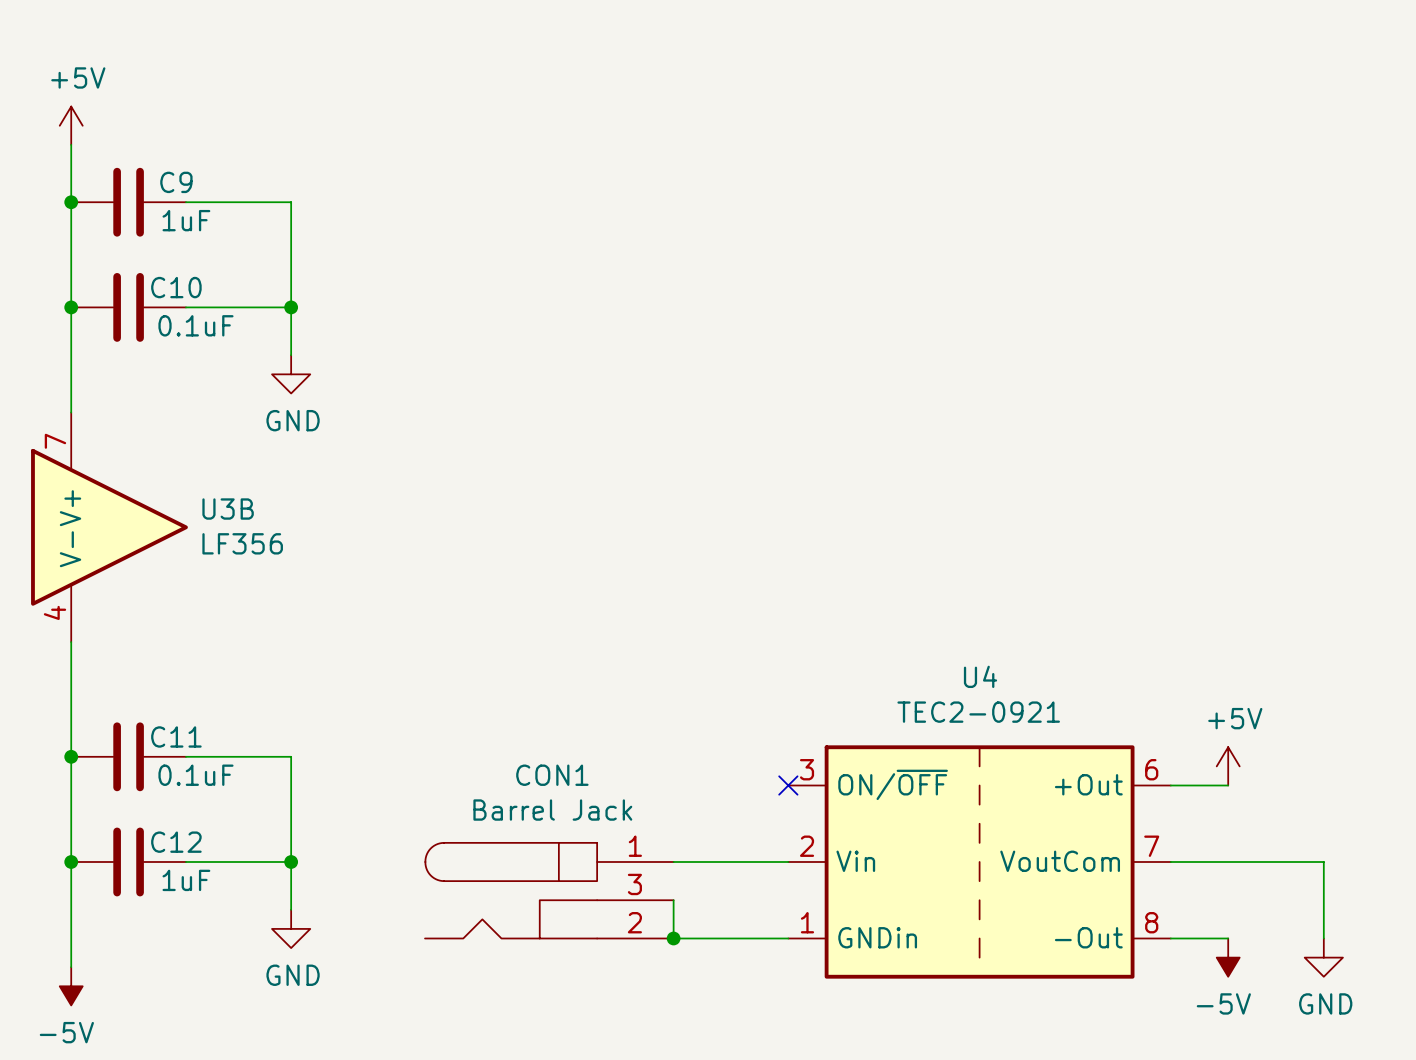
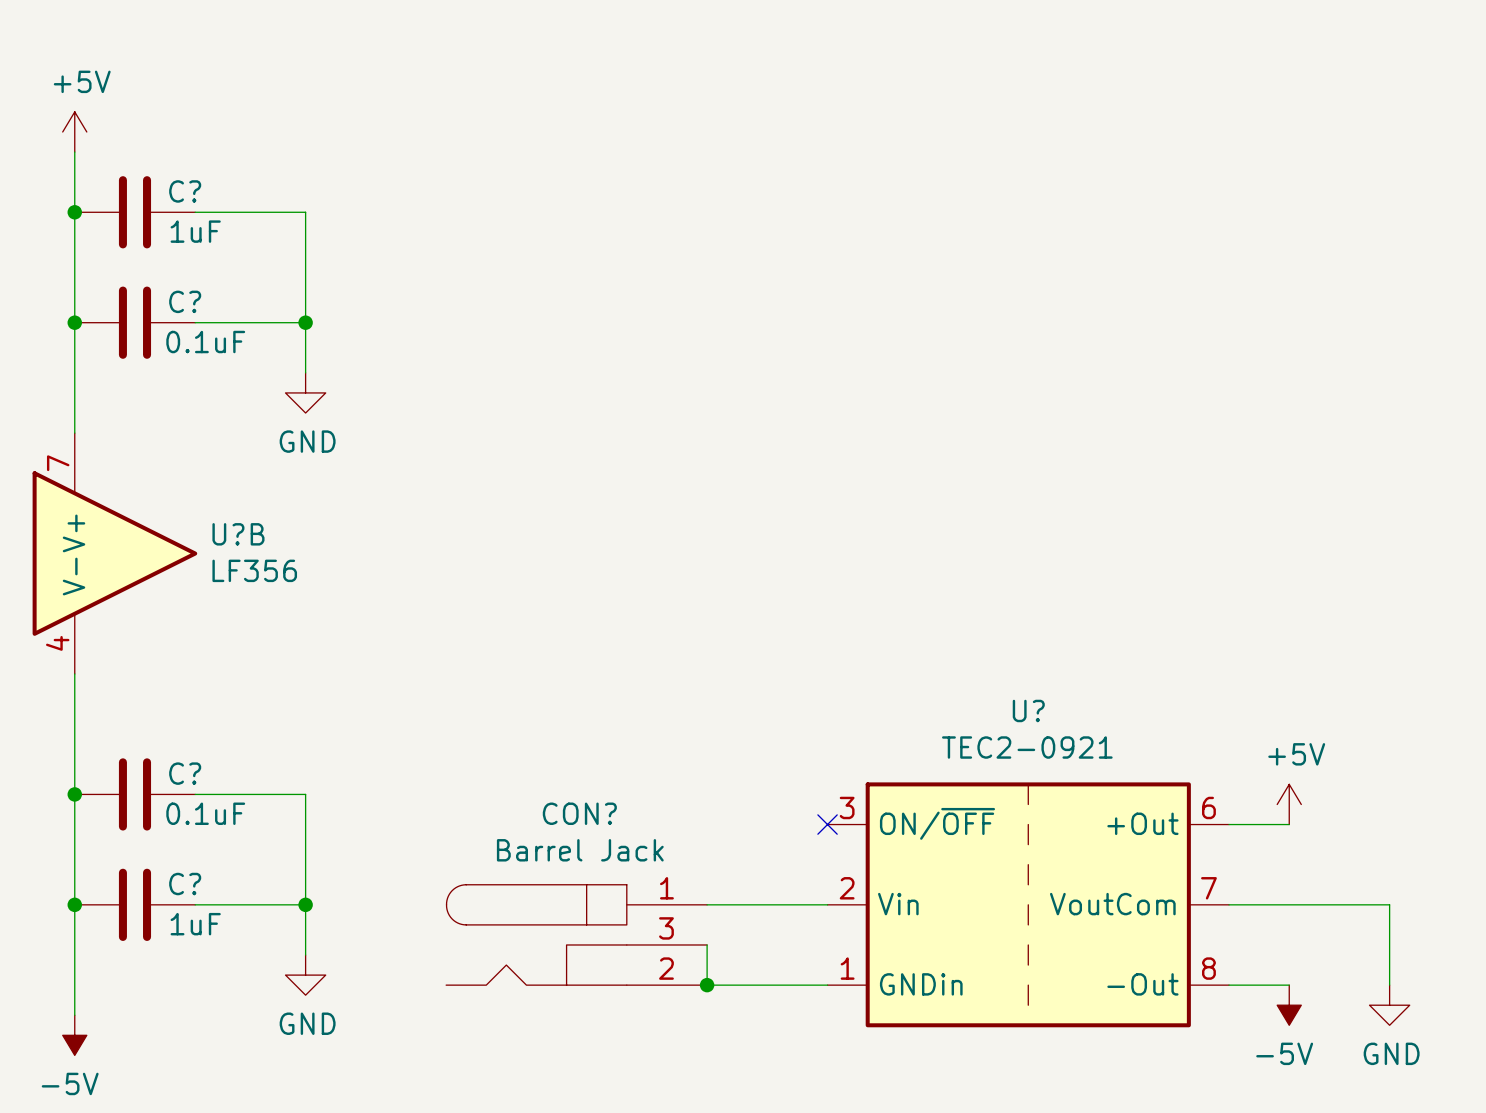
C9 name: C9 (176, 182) -> C? (185, 191)
C10 name: C10 (176, 287) -> C? (185, 301)
U3B name: U3B (228, 509) -> U?B (238, 534)
U4 name: U4 (980, 676) -> U? (1028, 710)
C11 name: C11 (176, 736) -> C? (185, 773)
CON1 name: CON1 (552, 775) -> CON? (579, 813)
C12 name: C12 (176, 842) -> C? (185, 884)

